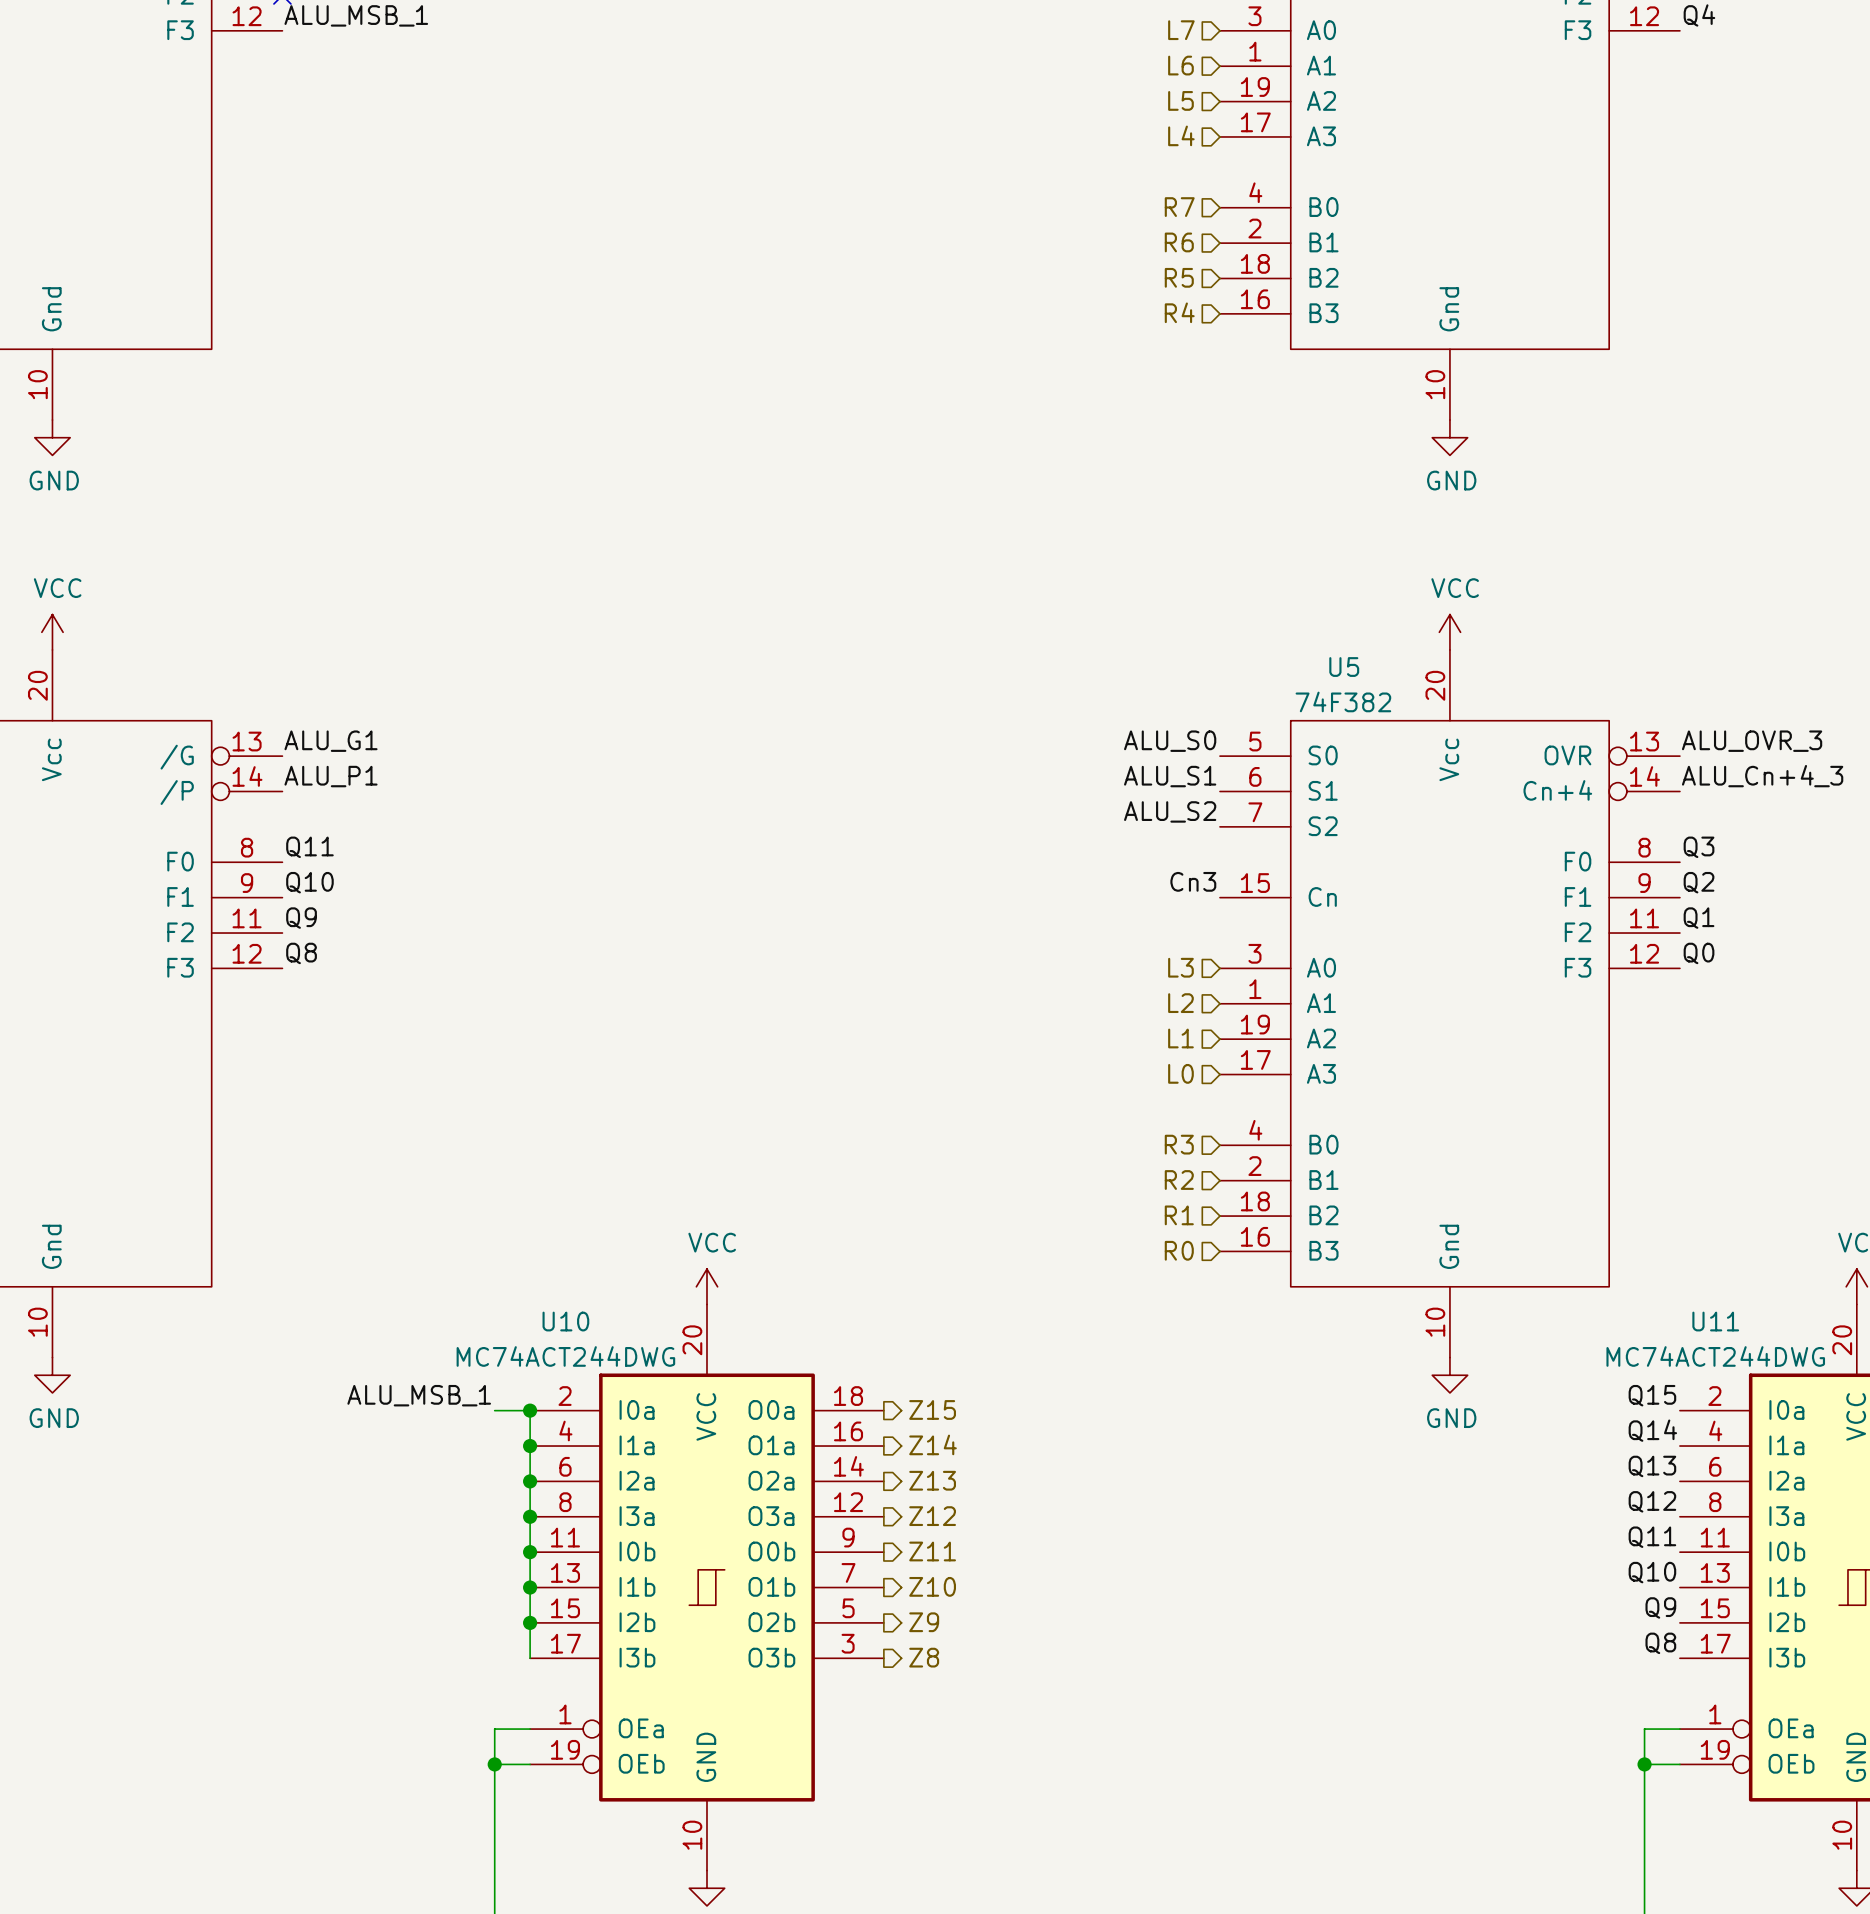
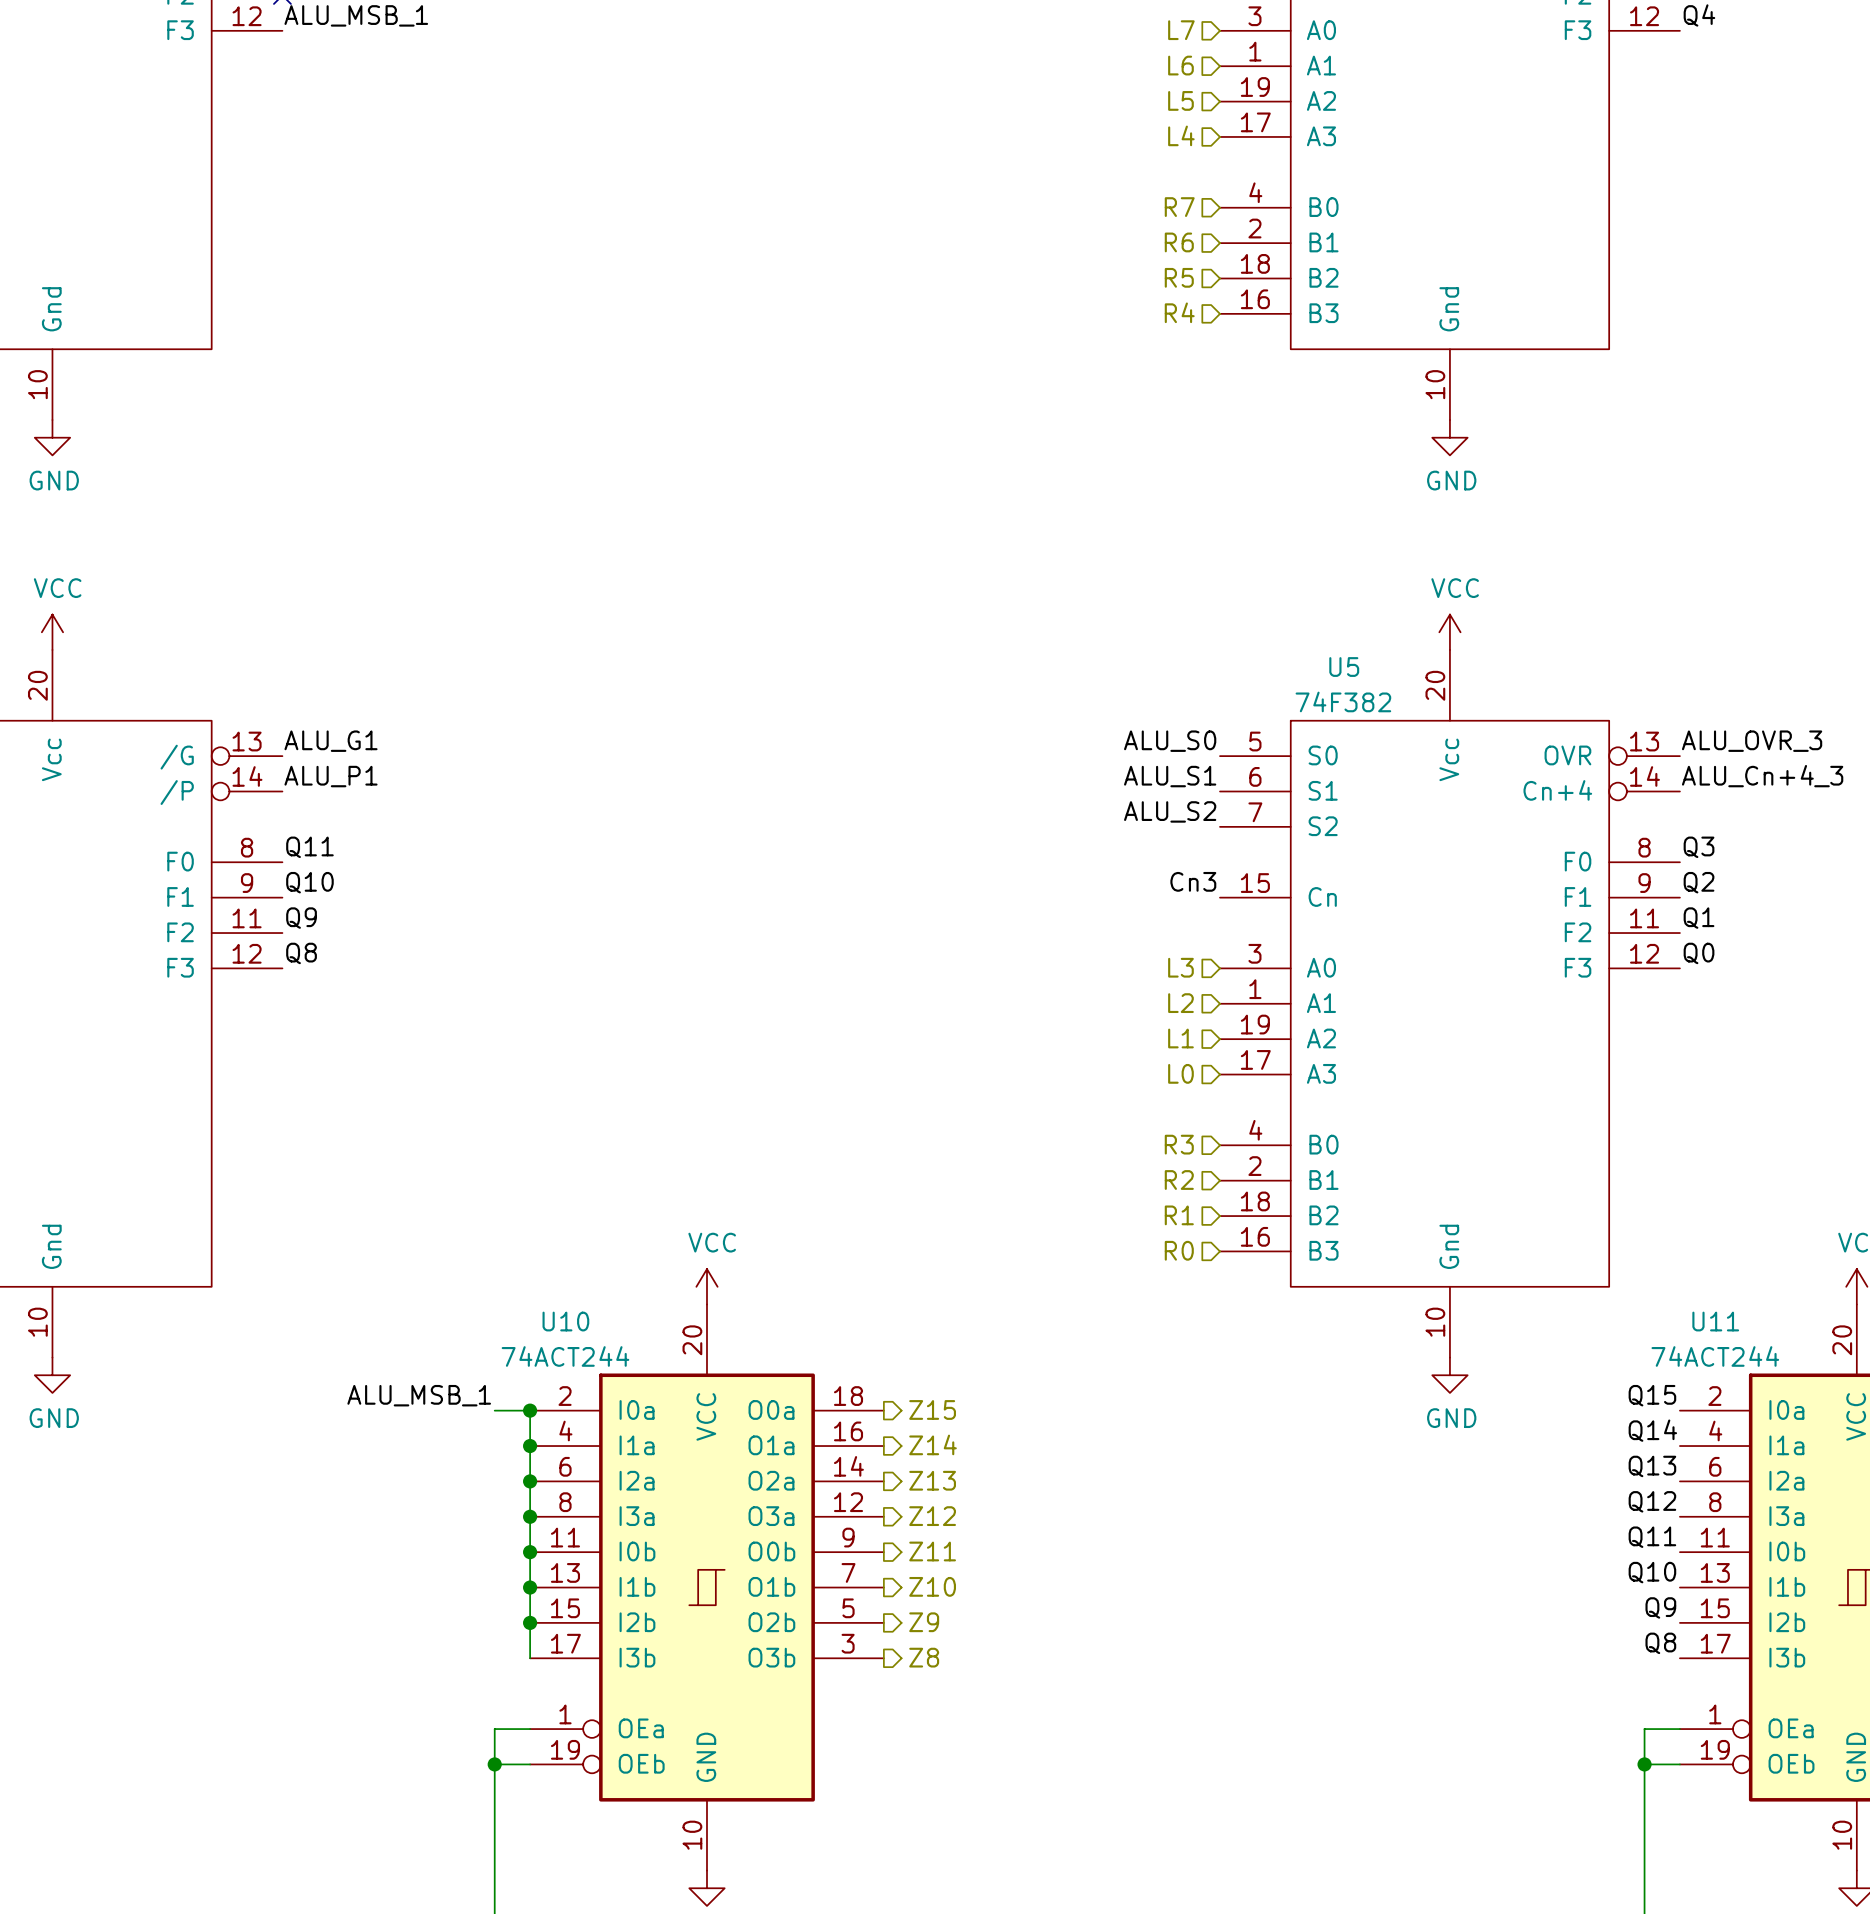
U10 value: MC74ACT244DWG (565, 1356) -> 74ACT244 (565, 1356)
U11 value: MC74ACT244DWG (1715, 1356) -> 74ACT244 (1715, 1356)

